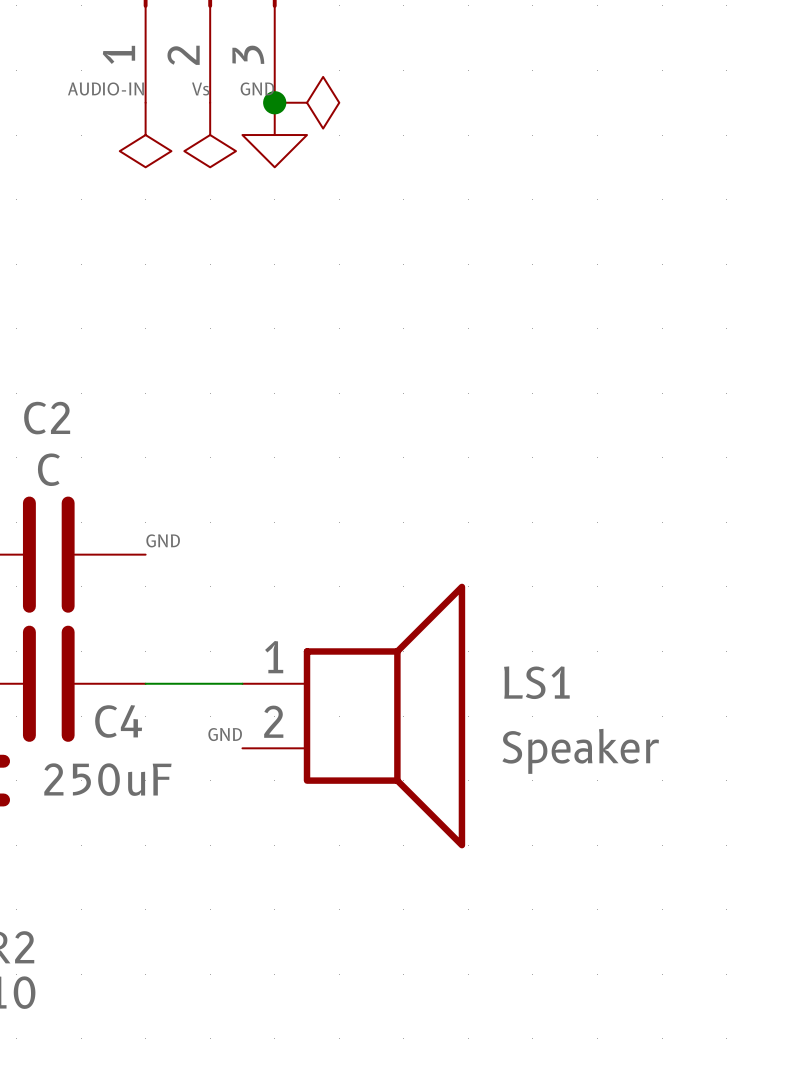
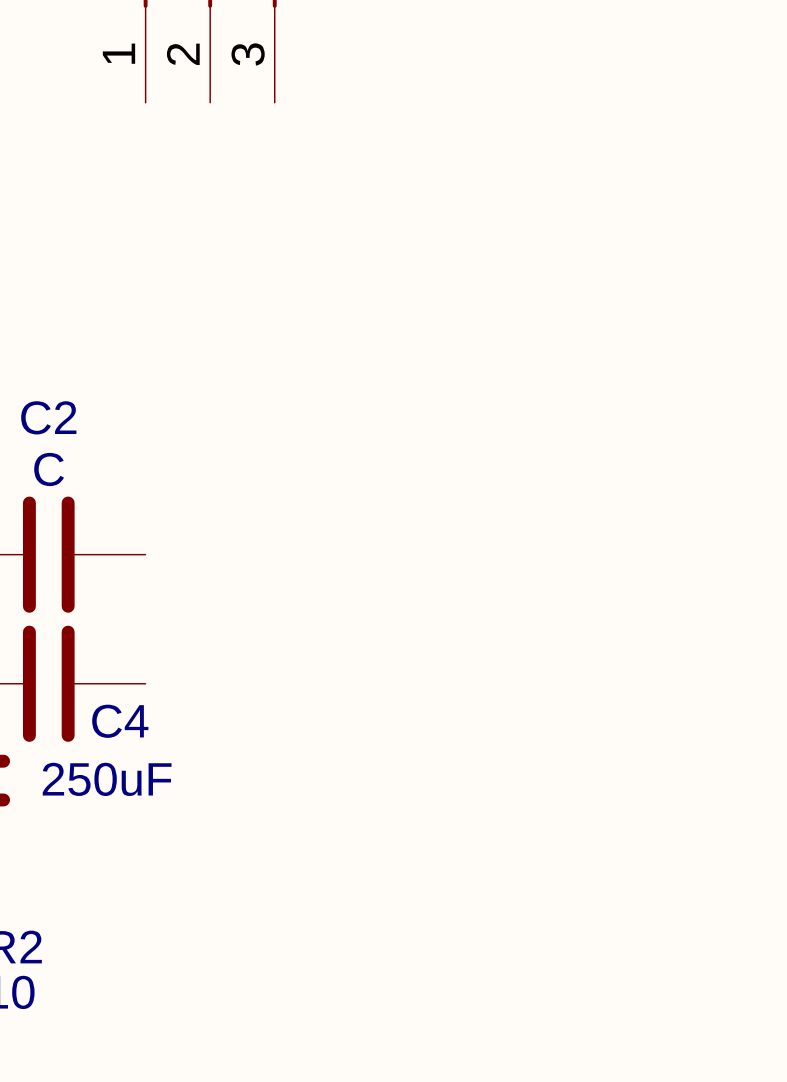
label: AUDIO-IN (105, 88) -> none
label: Vs (200, 88) -> none
label: GND (257, 88) -> none
junction: (274, 102) -> none
power symbol: (307, 102) -> none
power symbol: (145, 135) -> none
power symbol: (210, 135) -> none
power symbol: (274, 135) -> none
label: GND (163, 540) -> none
wire: (145, 683) (242, 683) -> none
LS1: Speaker (353, 716) -> none
label: GND (225, 734) -> none

